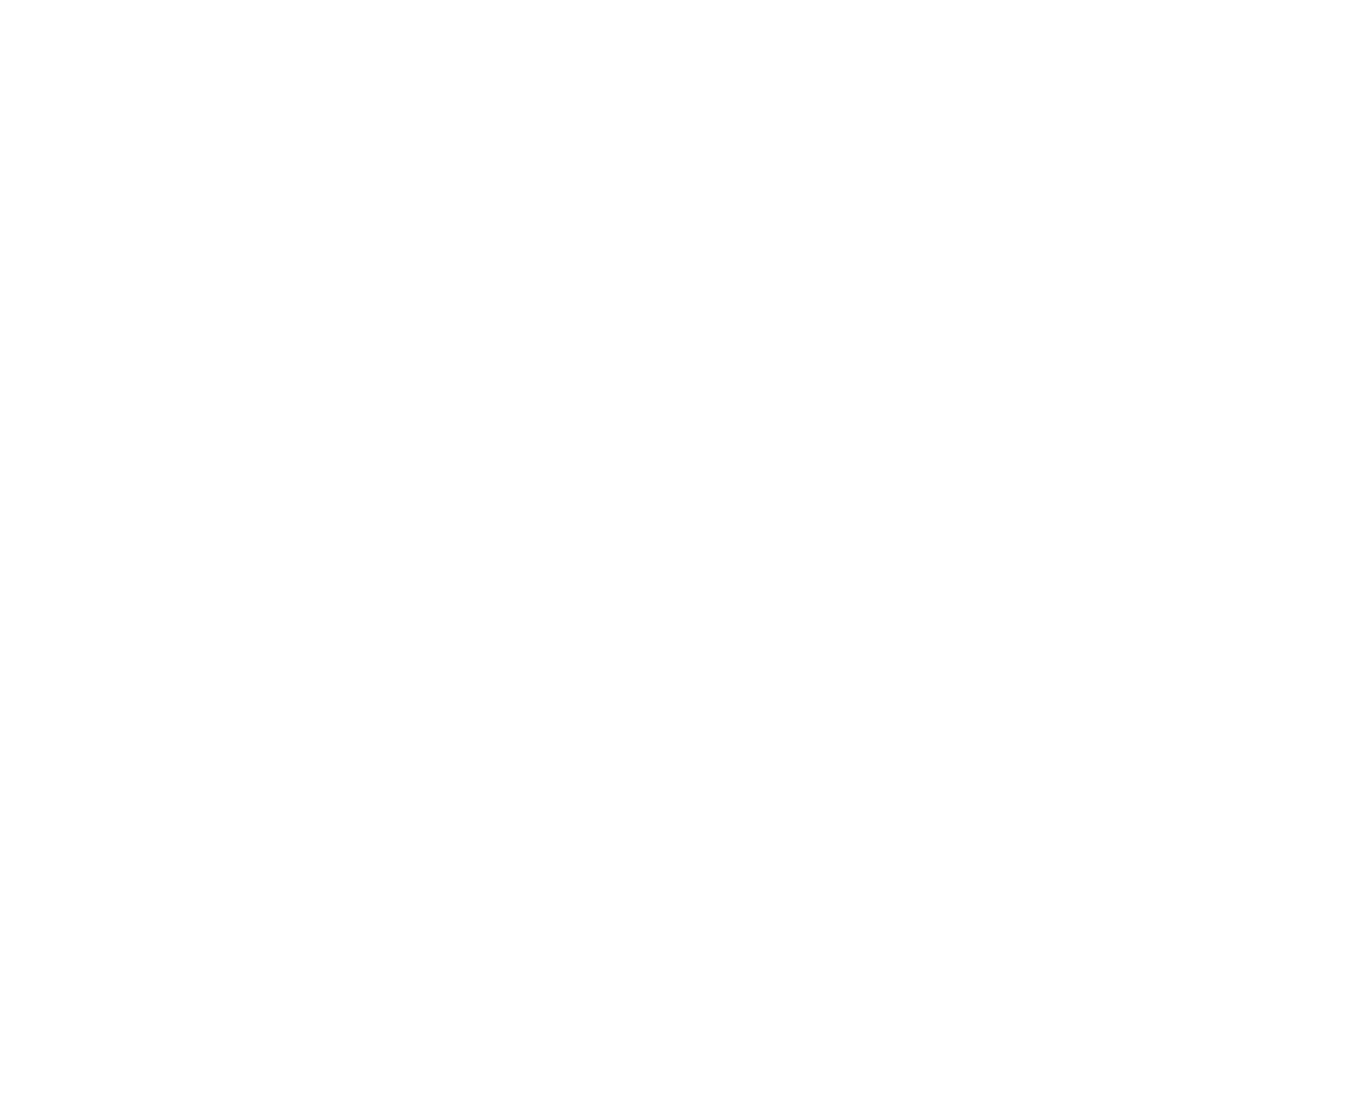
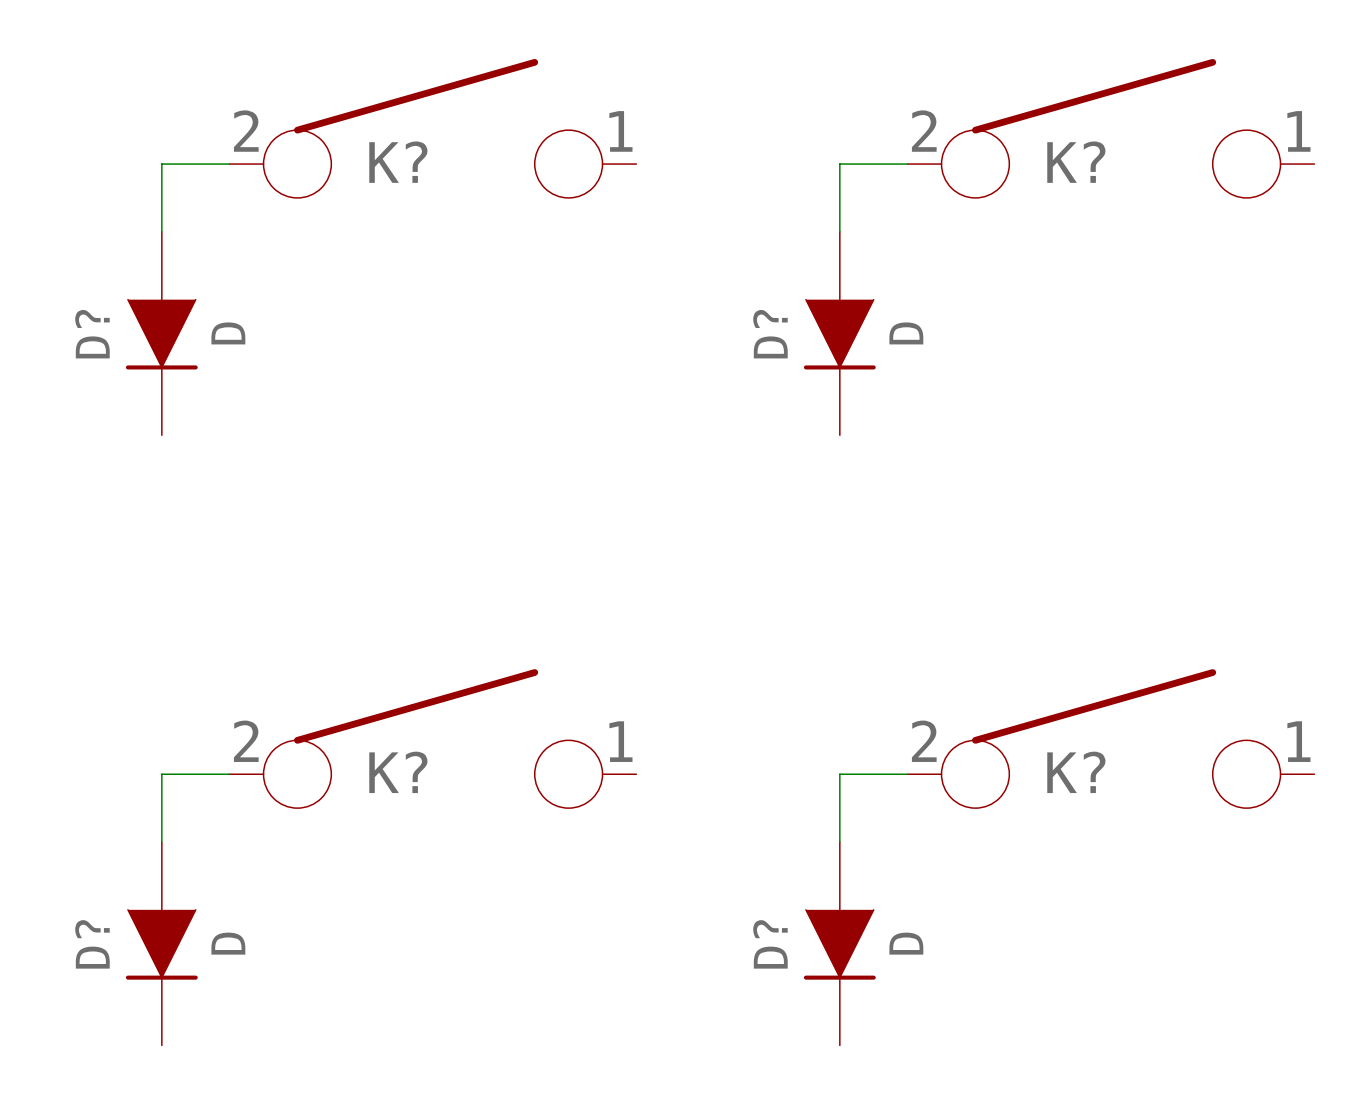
K?: none -> (433, 128)
K?: none -> (1111, 128)
wire: none -> (229, 164) (161, 164) (161, 231)
wire: none -> (907, 164) (839, 164) (839, 231)
D?: none -> D (161, 333)
D?: none -> D (839, 333)
K?: none -> (433, 738)
K?: none -> (1111, 738)
wire: none -> (229, 774) (161, 774) (161, 842)
wire: none -> (907, 774) (839, 774) (839, 842)
D?: none -> D (161, 943)
D?: none -> D (839, 943)

